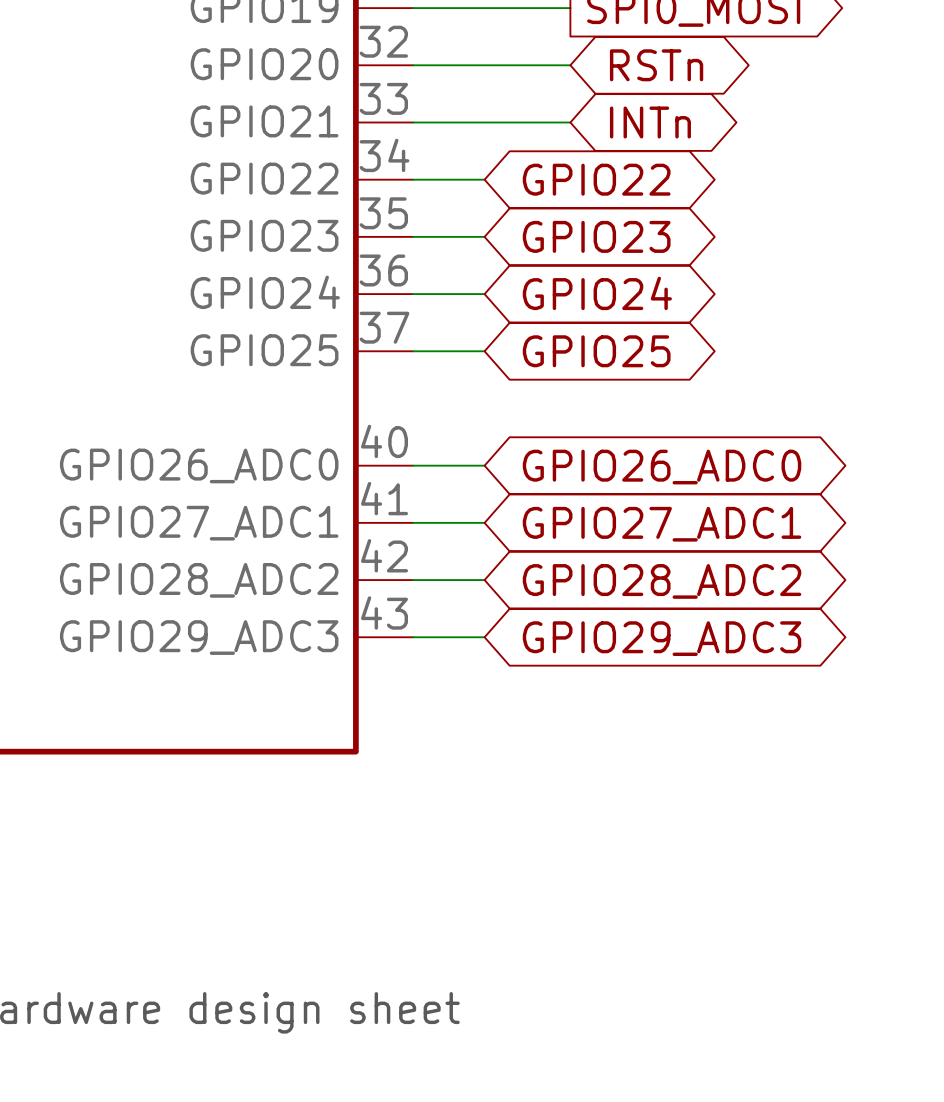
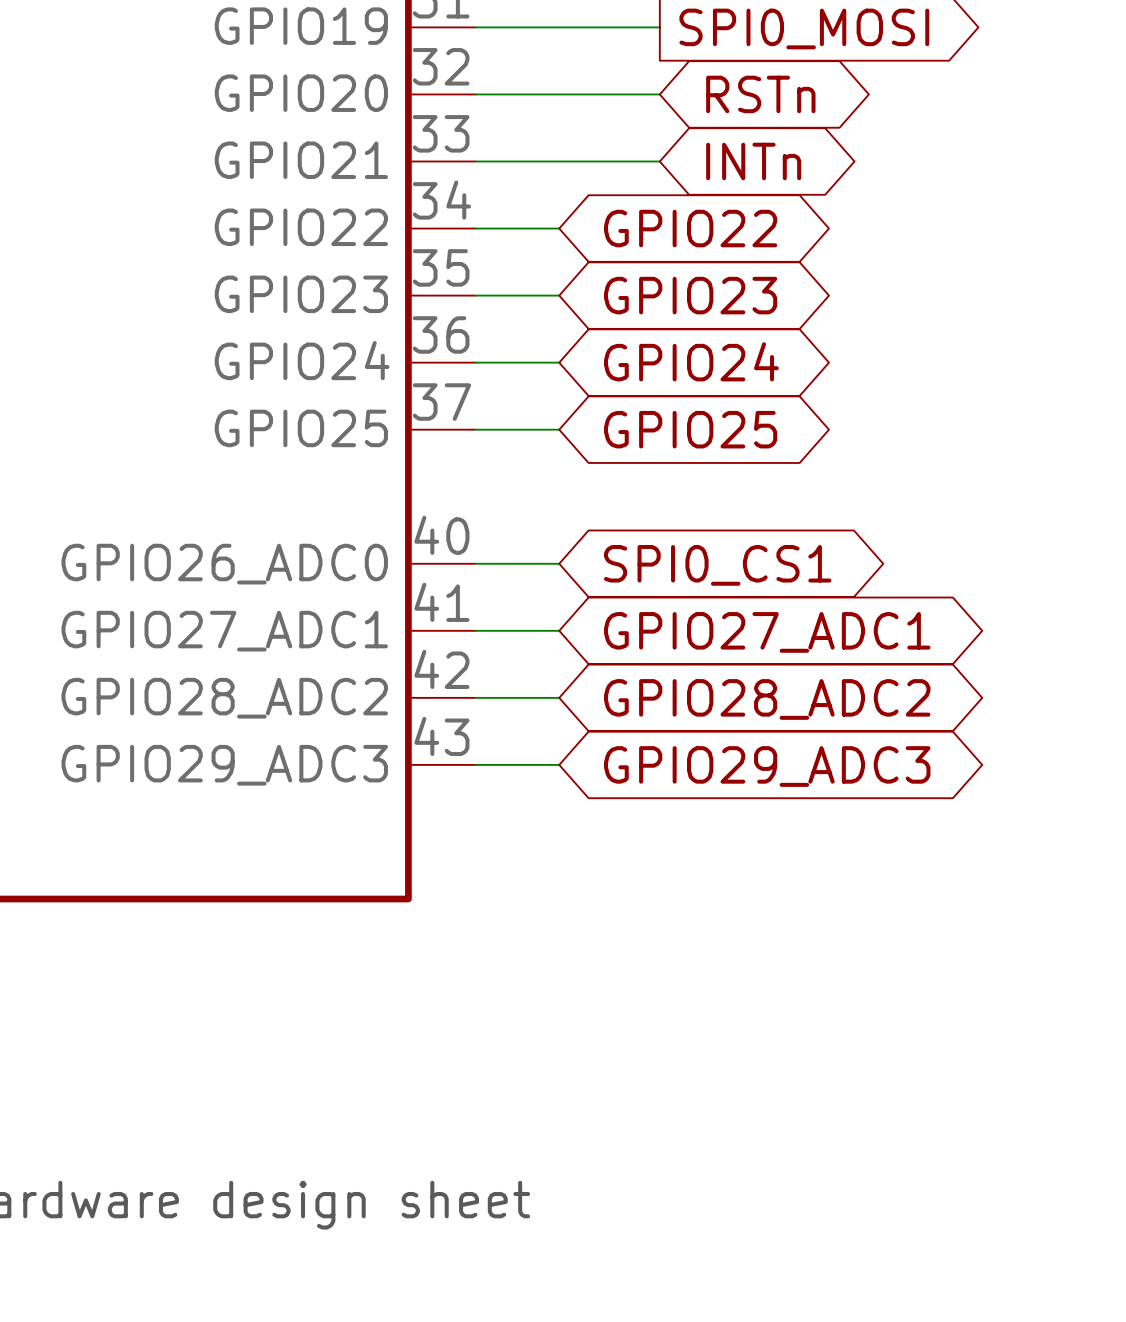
global label: GPIO26_ADC0 (662, 467) -> SPI0_CS1 (717, 565)

